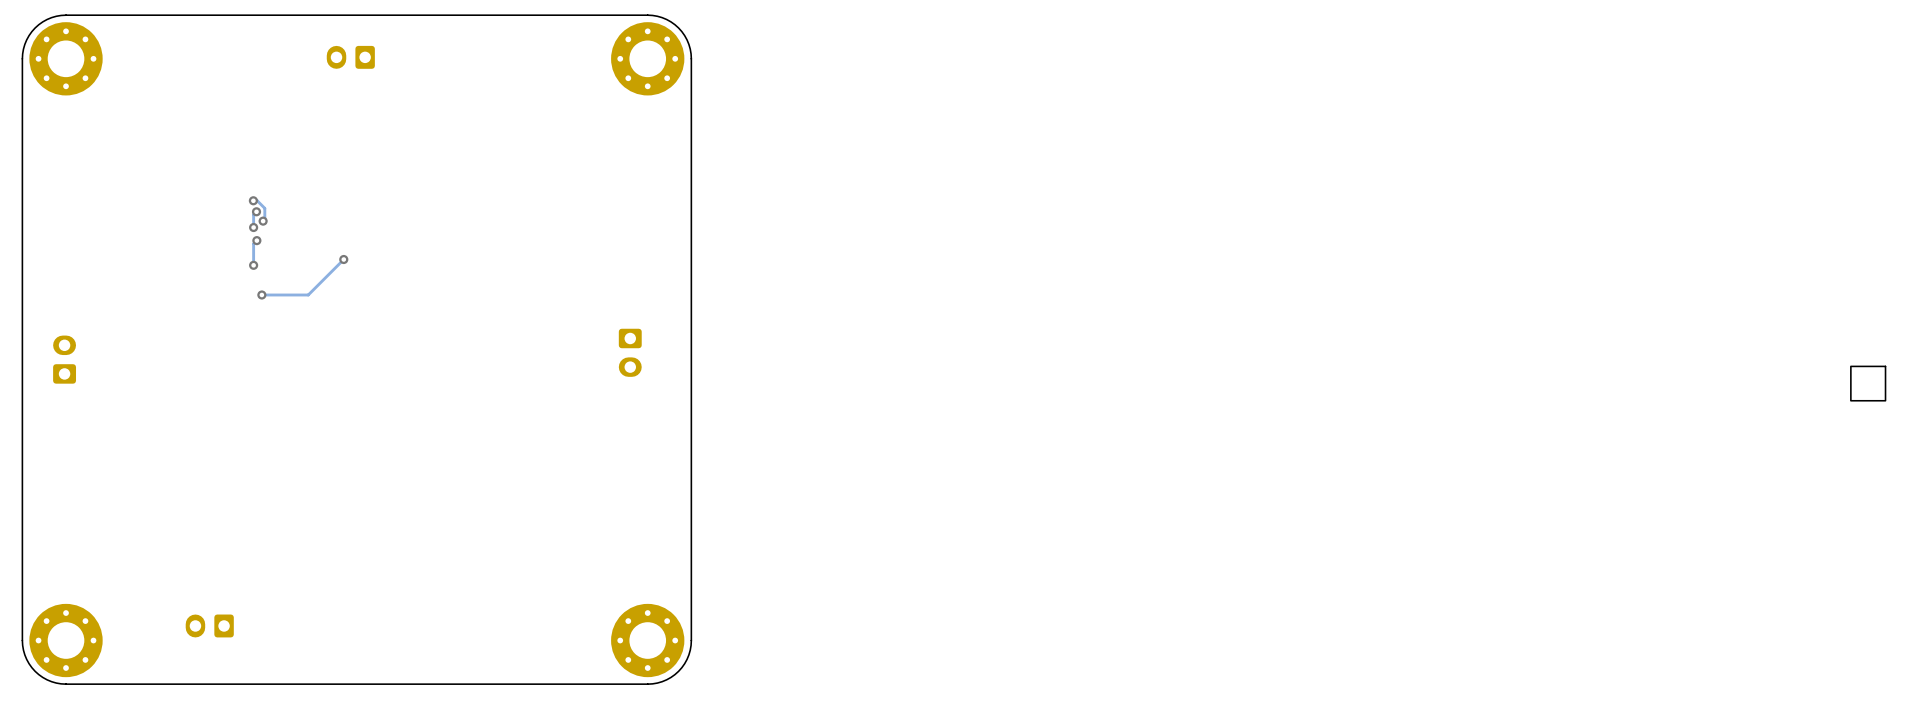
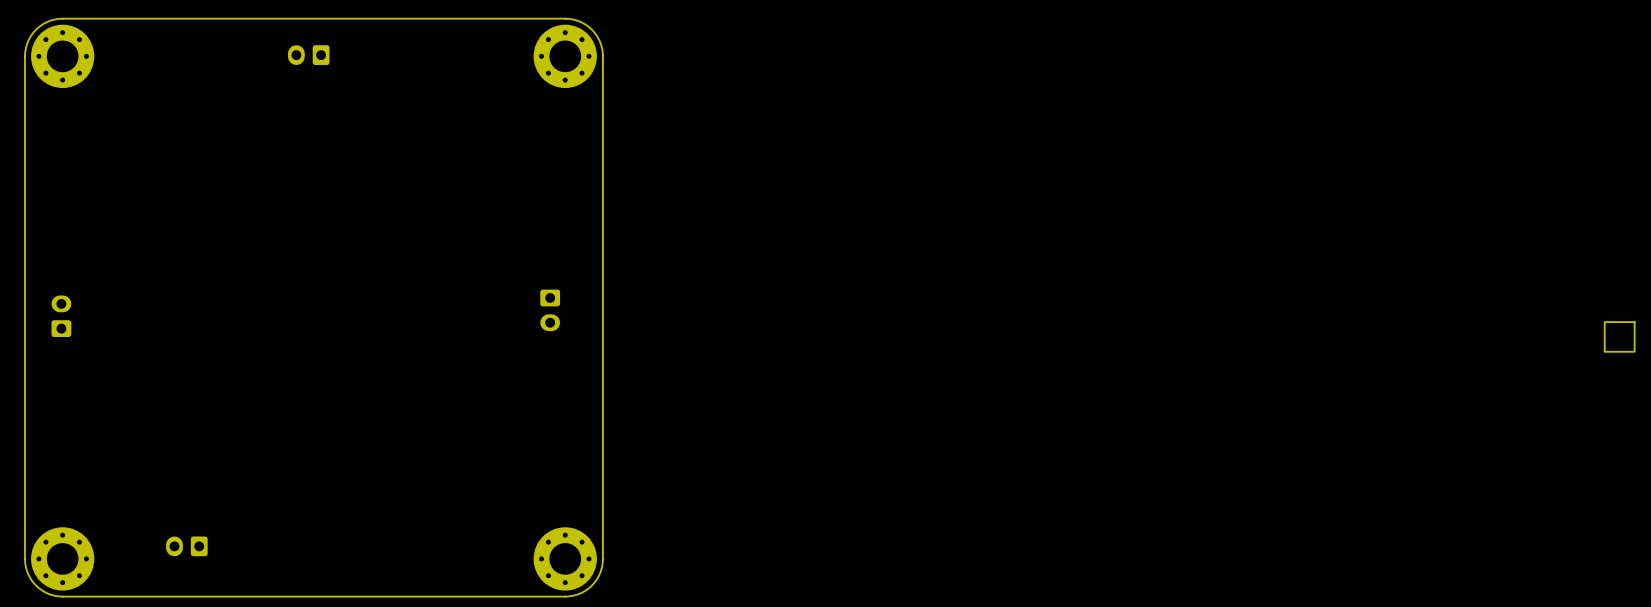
track: (253, 200) (257, 200) (264, 208) (263, 221) -> none
via: (253, 200) -> none
track: (256, 211) (253, 214) (253, 227) -> none
via: (256, 211) -> none
via: (263, 221) -> none
via: (253, 227) -> none
track: (256, 240) (253, 243) (253, 265) -> none
via: (256, 240) -> none
track: (343, 259) (308, 294) (261, 294) -> none
via: (343, 259) -> none
via: (253, 265) -> none
via: (261, 294) -> none

